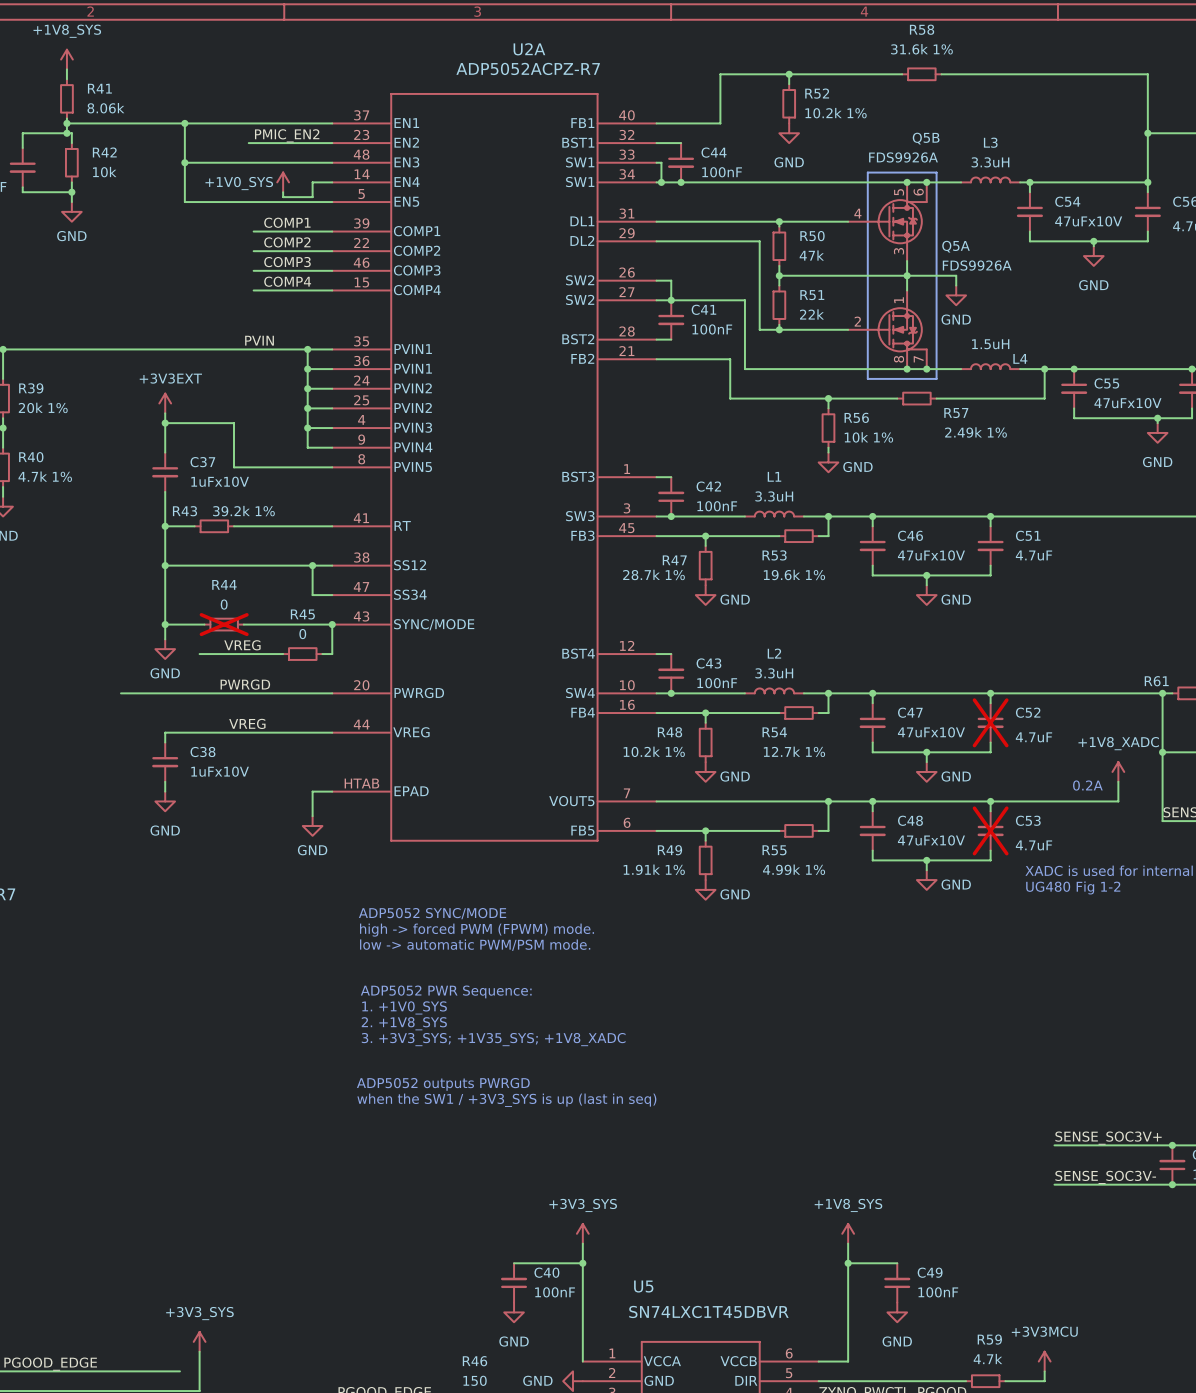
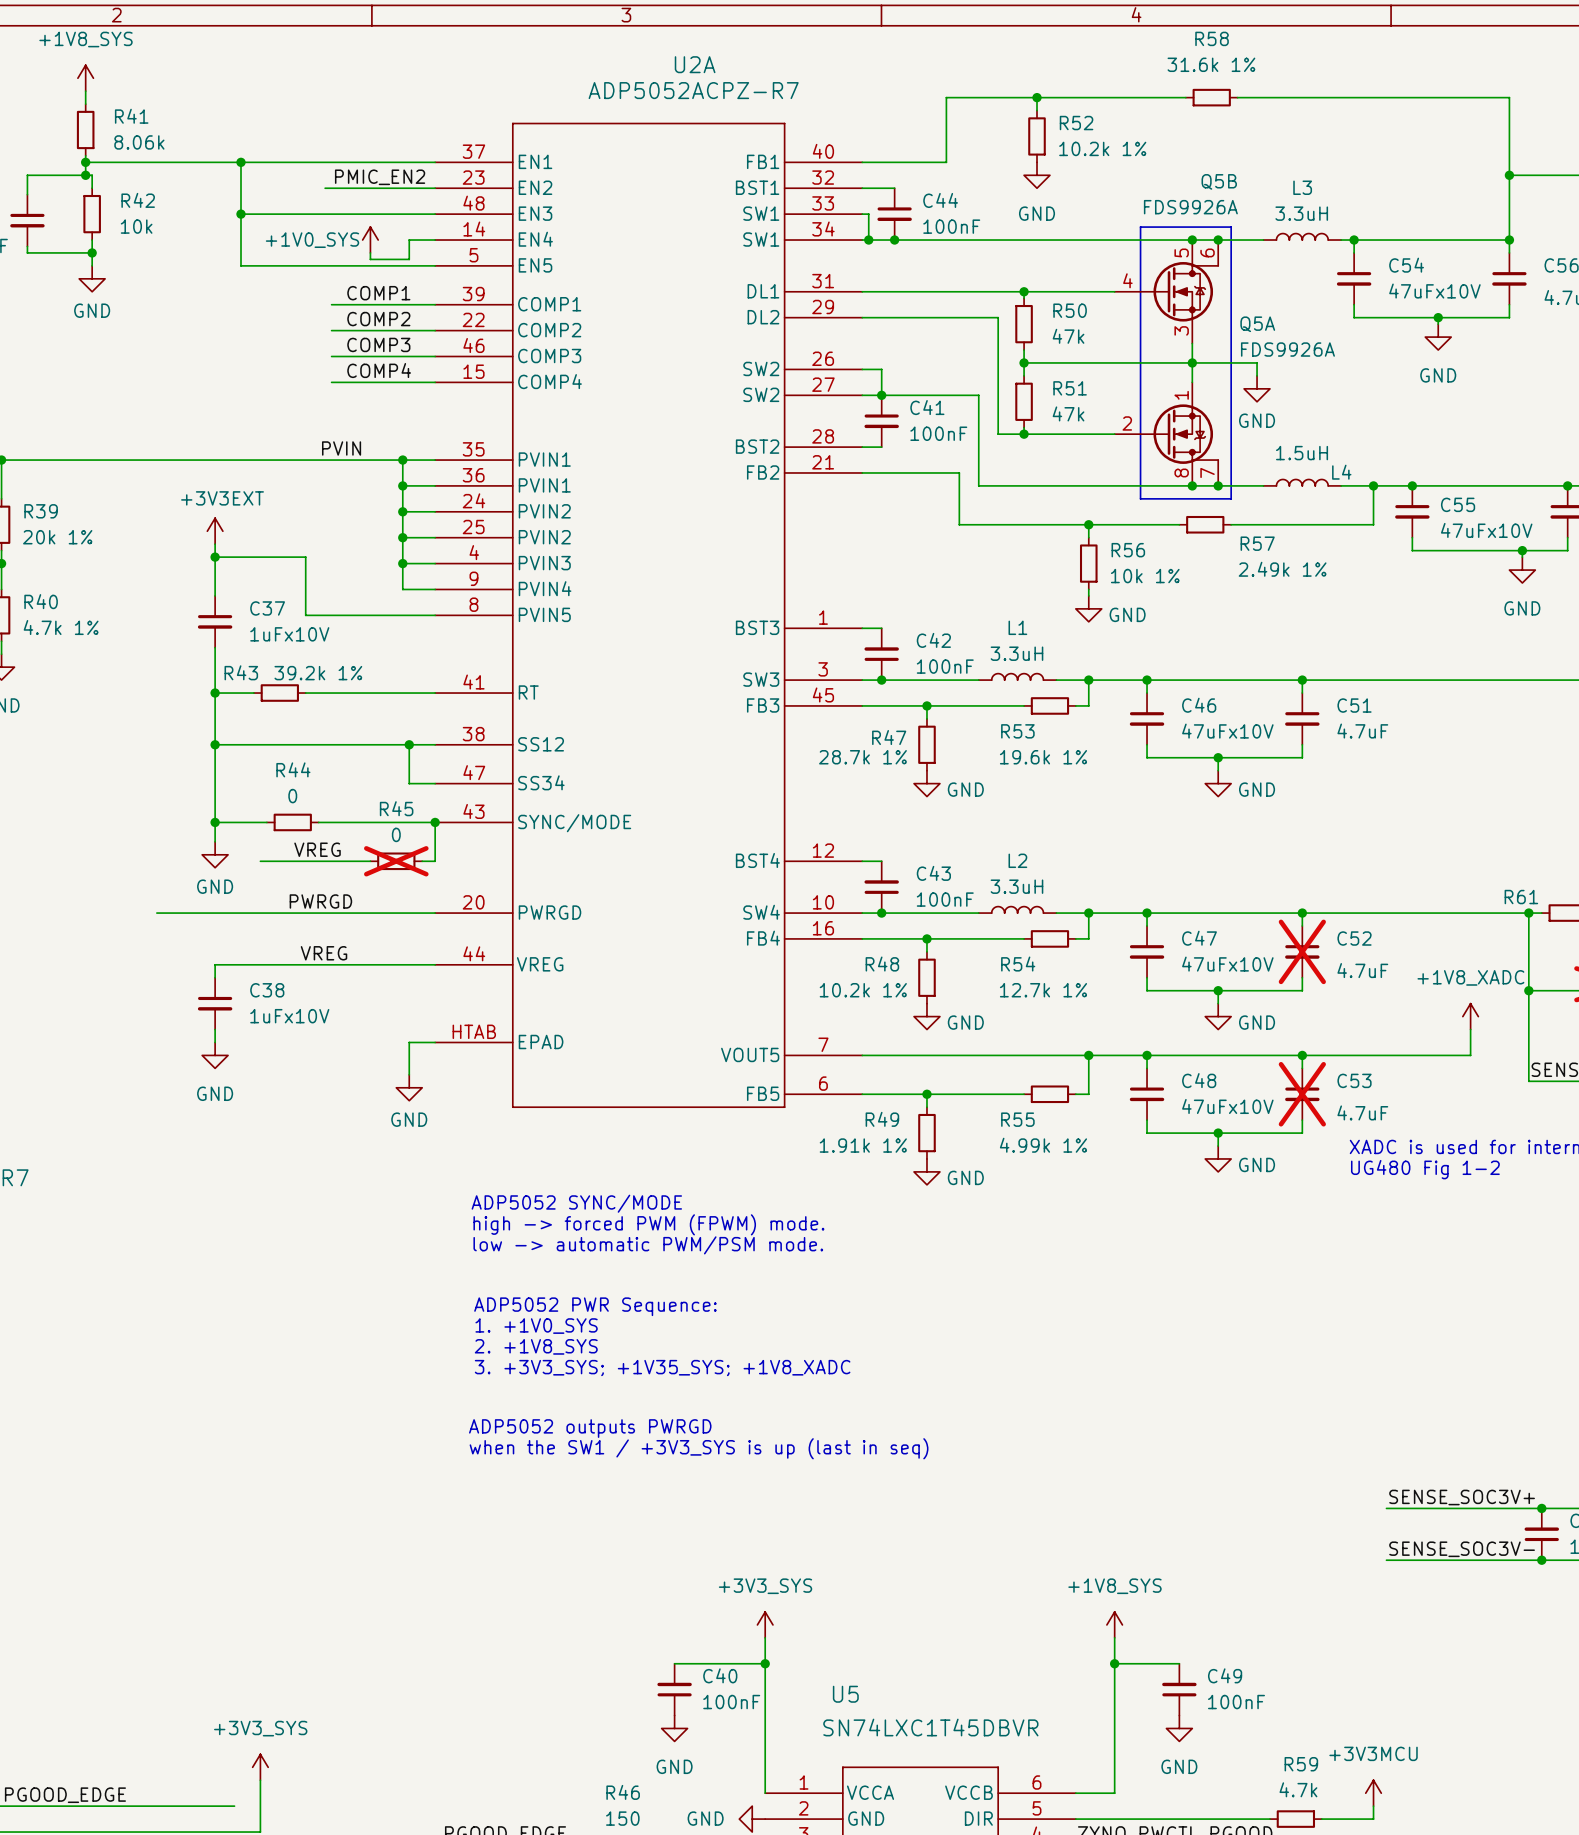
R51 value: 22k (811, 314) -> 47k (1068, 413)
R44 do-not-place cross: (224, 624) -> none
R45 do-not-place cross: none -> (396, 861)
text: 0.2A (1087, 785) -> none

